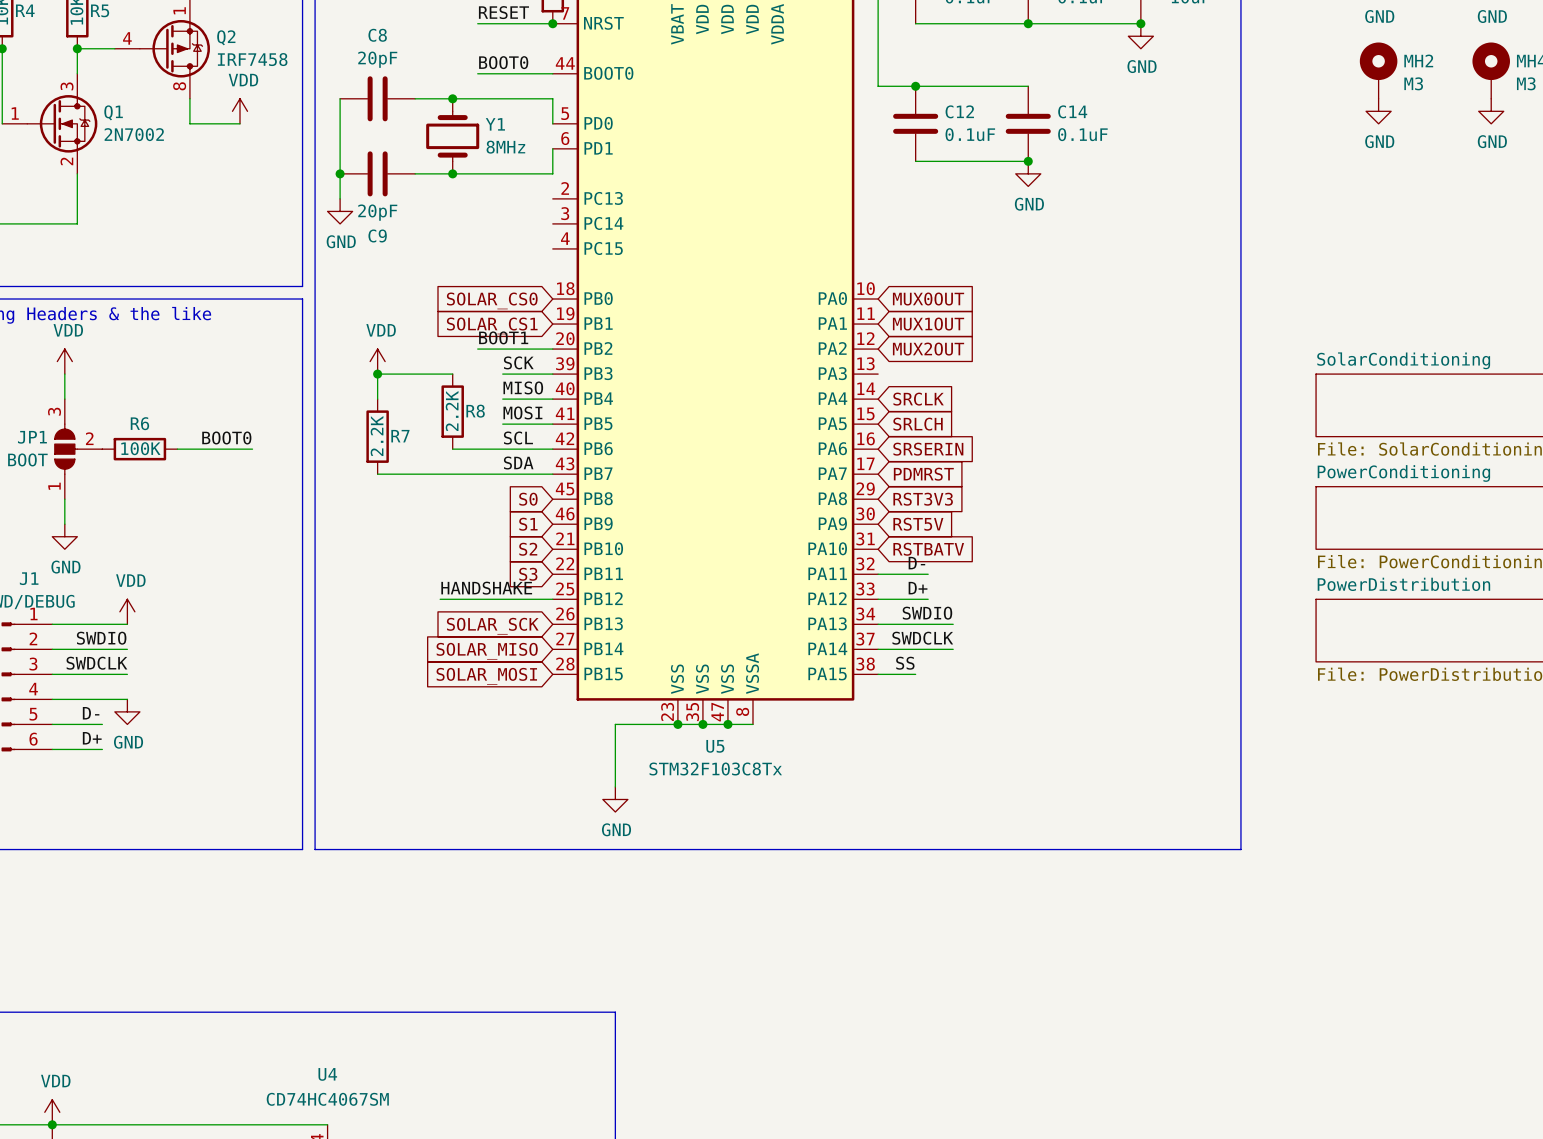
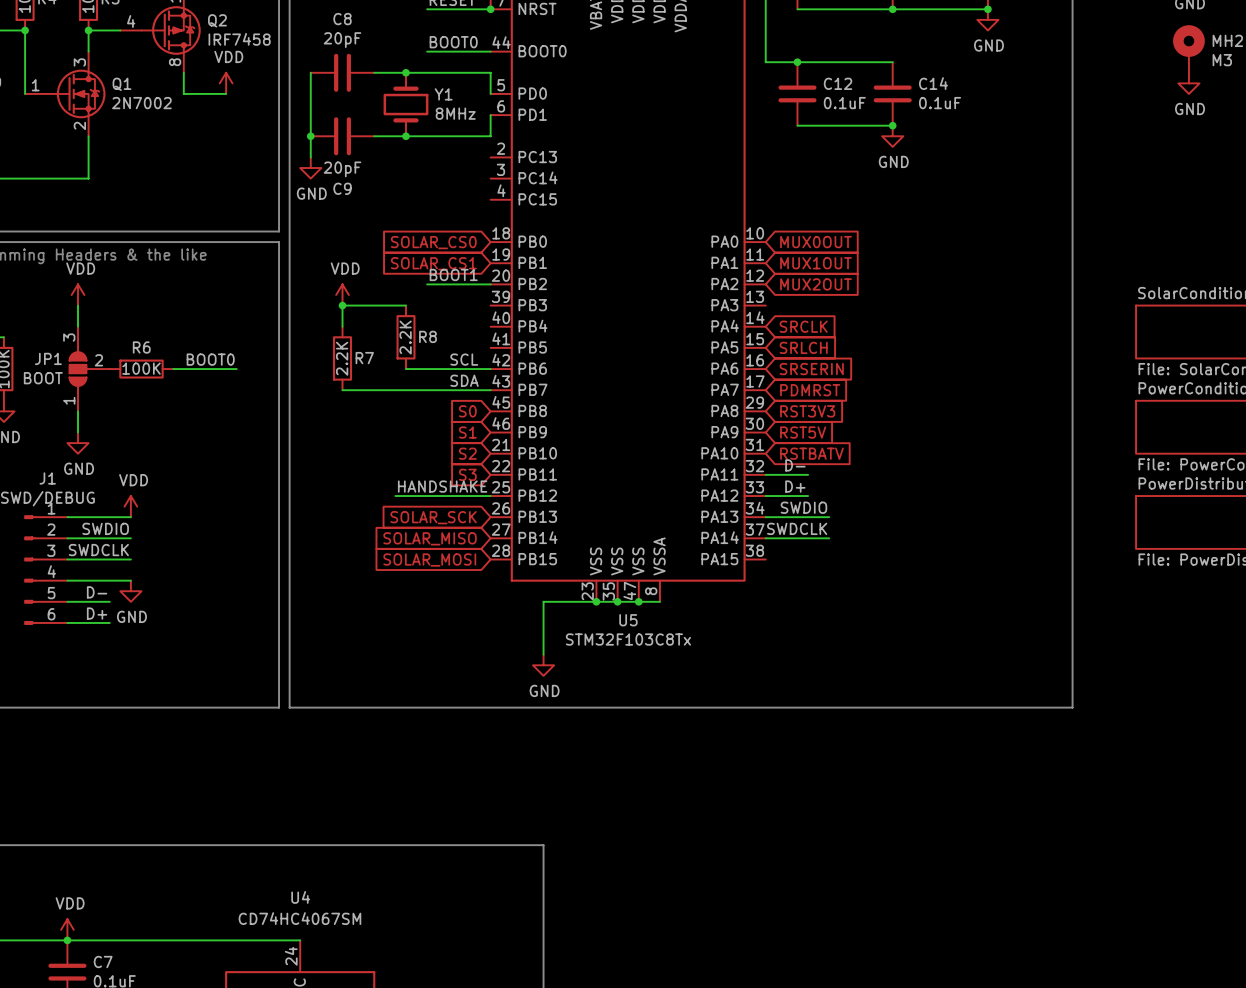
label: SCK (518, 362) -> none
wire: (502, 374) (552, 374) -> none
label: MISO (523, 387) -> none
wire: (502, 399) (552, 399) -> none
label: MOSI (522, 412) -> none
wire: (502, 424) (552, 424) -> none
label: SS (905, 663) -> none
wire: (878, 674) (915, 674) -> none

